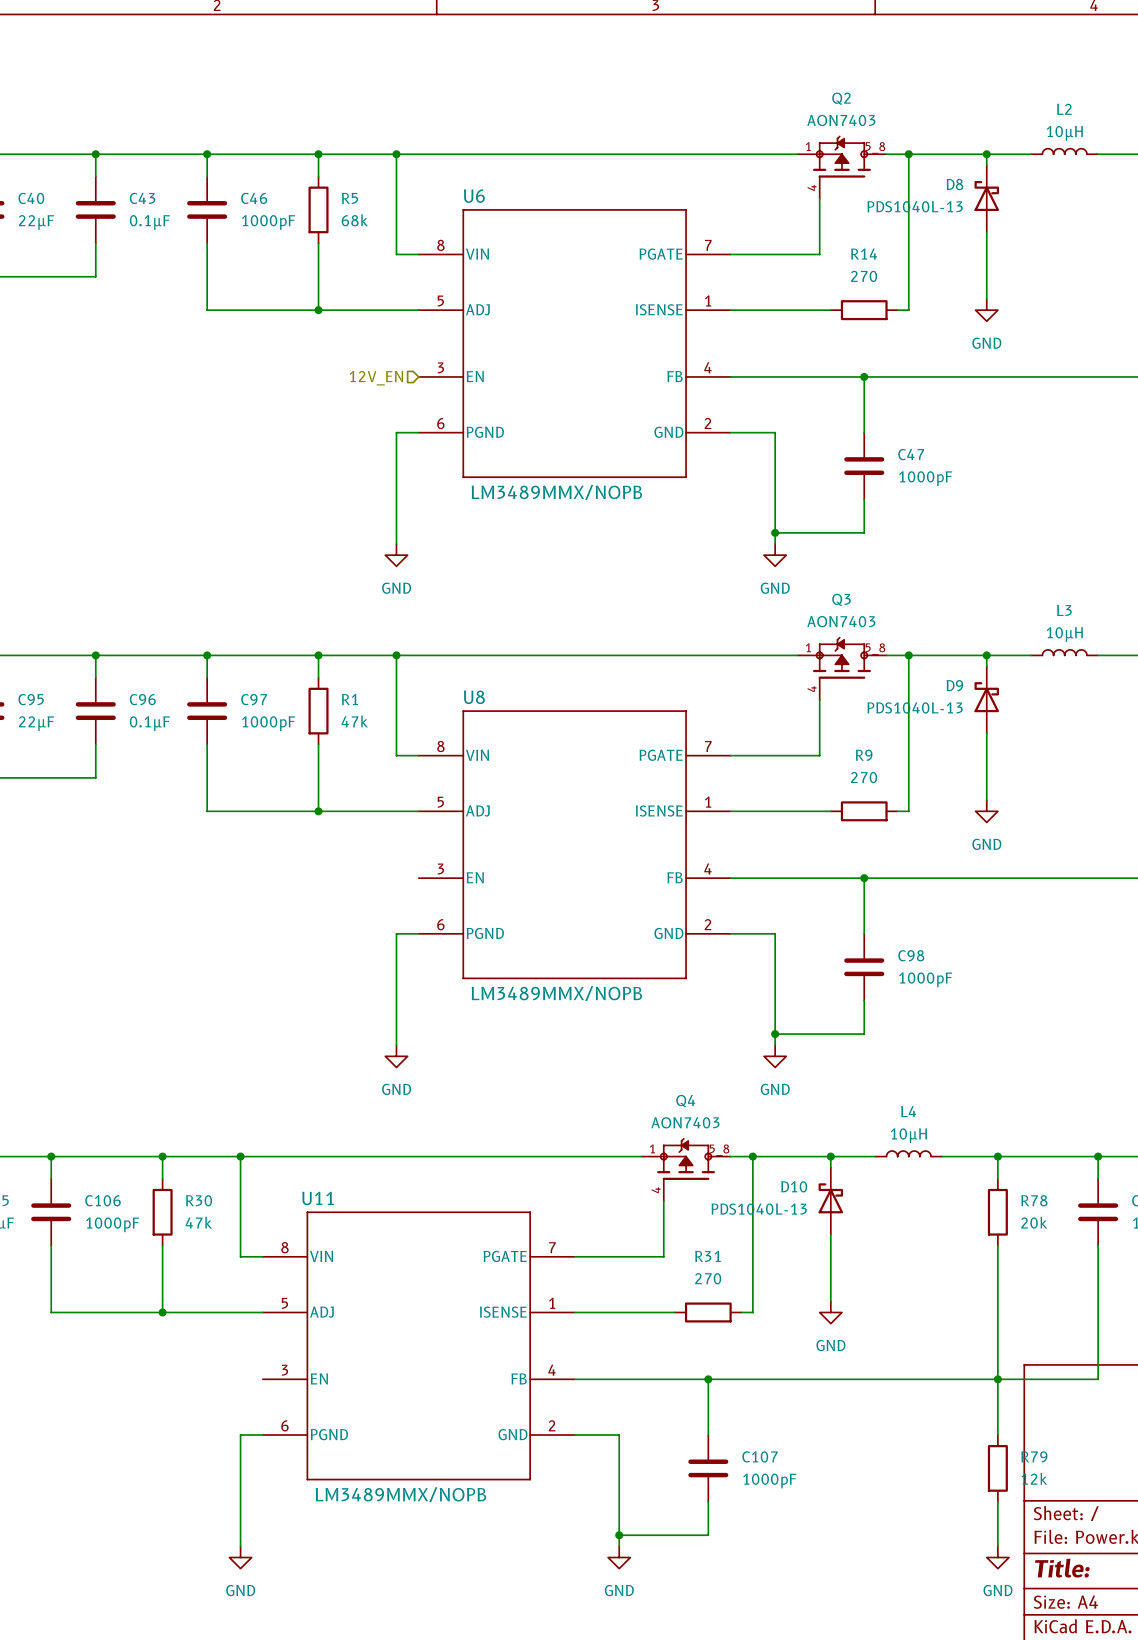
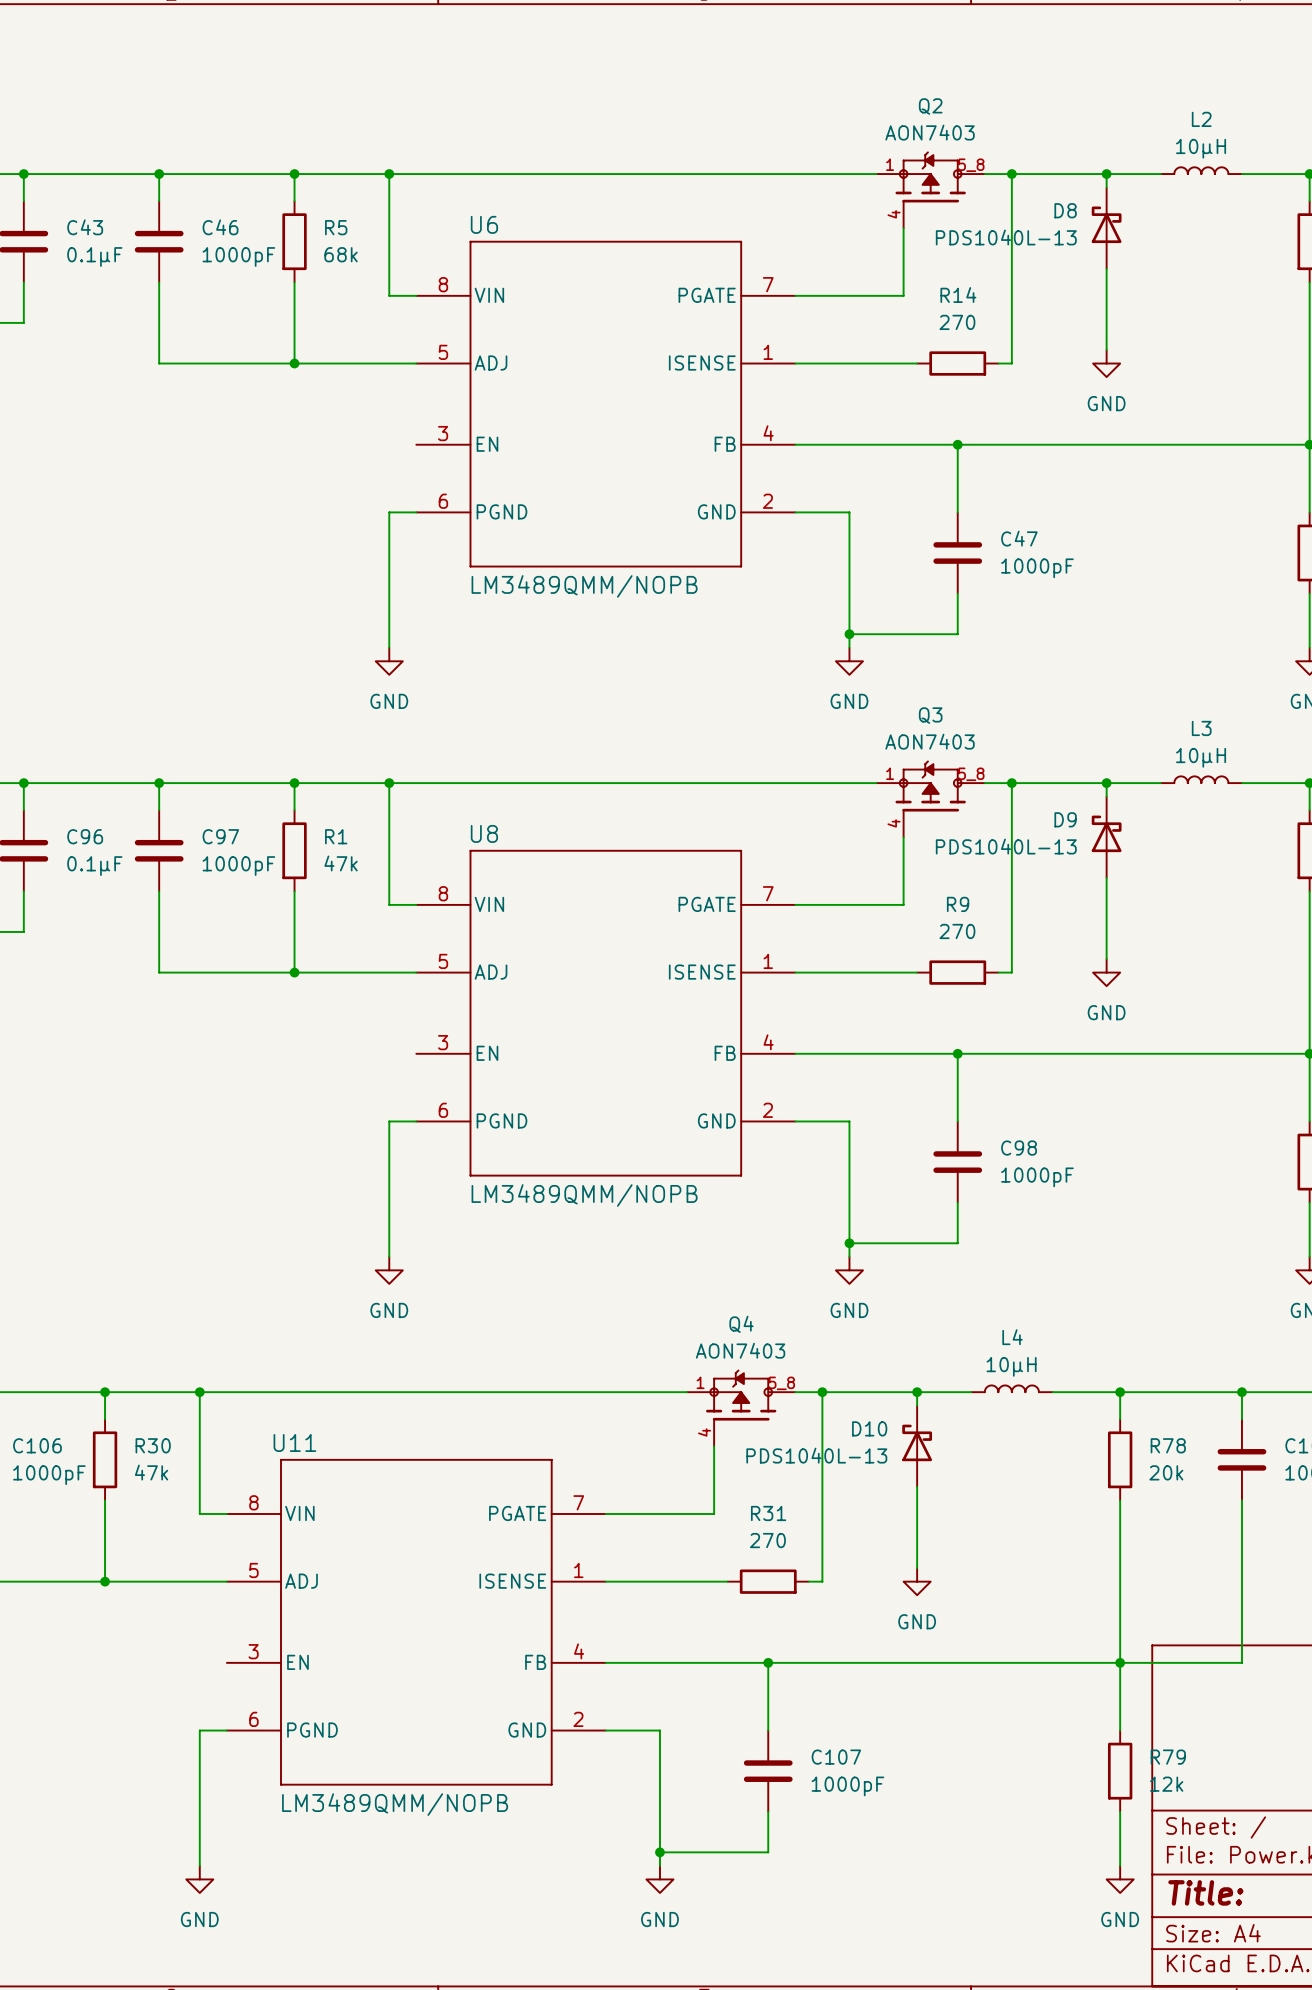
hierarchical label: 12V_EN (376, 378) -> none
U6 value: LM3489MMX/NOPB (556, 492) -> LM3489QMM/NOPB (584, 586)
U8 value: LM3489MMX/NOPB (556, 993) -> LM3489QMM/NOPB (584, 1195)
U11 value: LM3489MMX/NOPB (400, 1494) -> LM3489QMM/NOPB (395, 1804)

